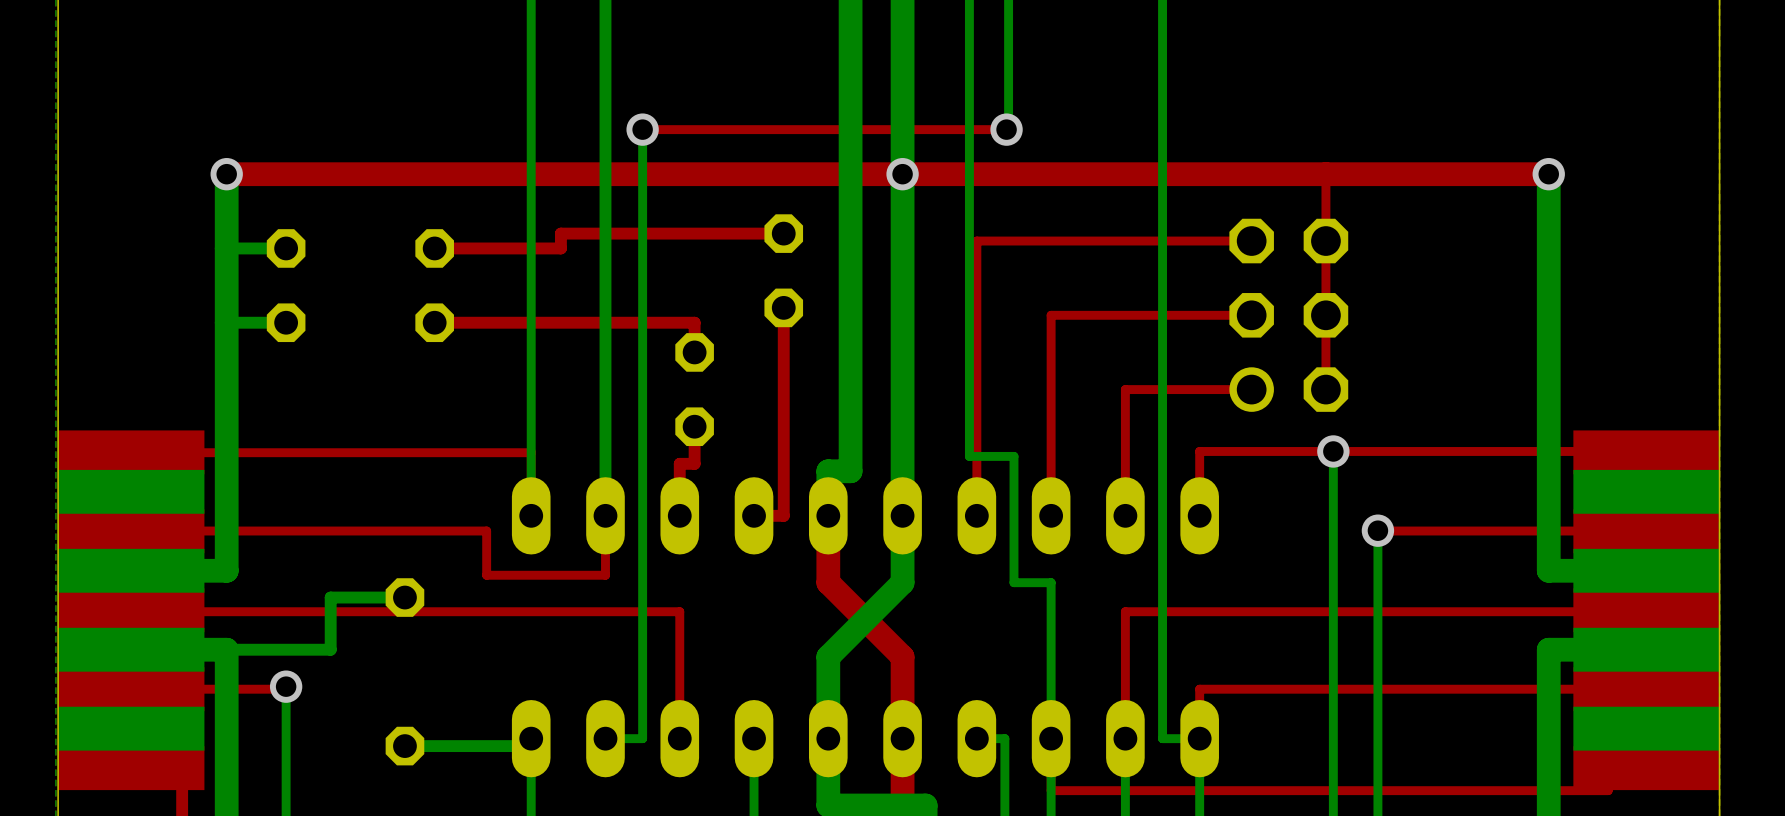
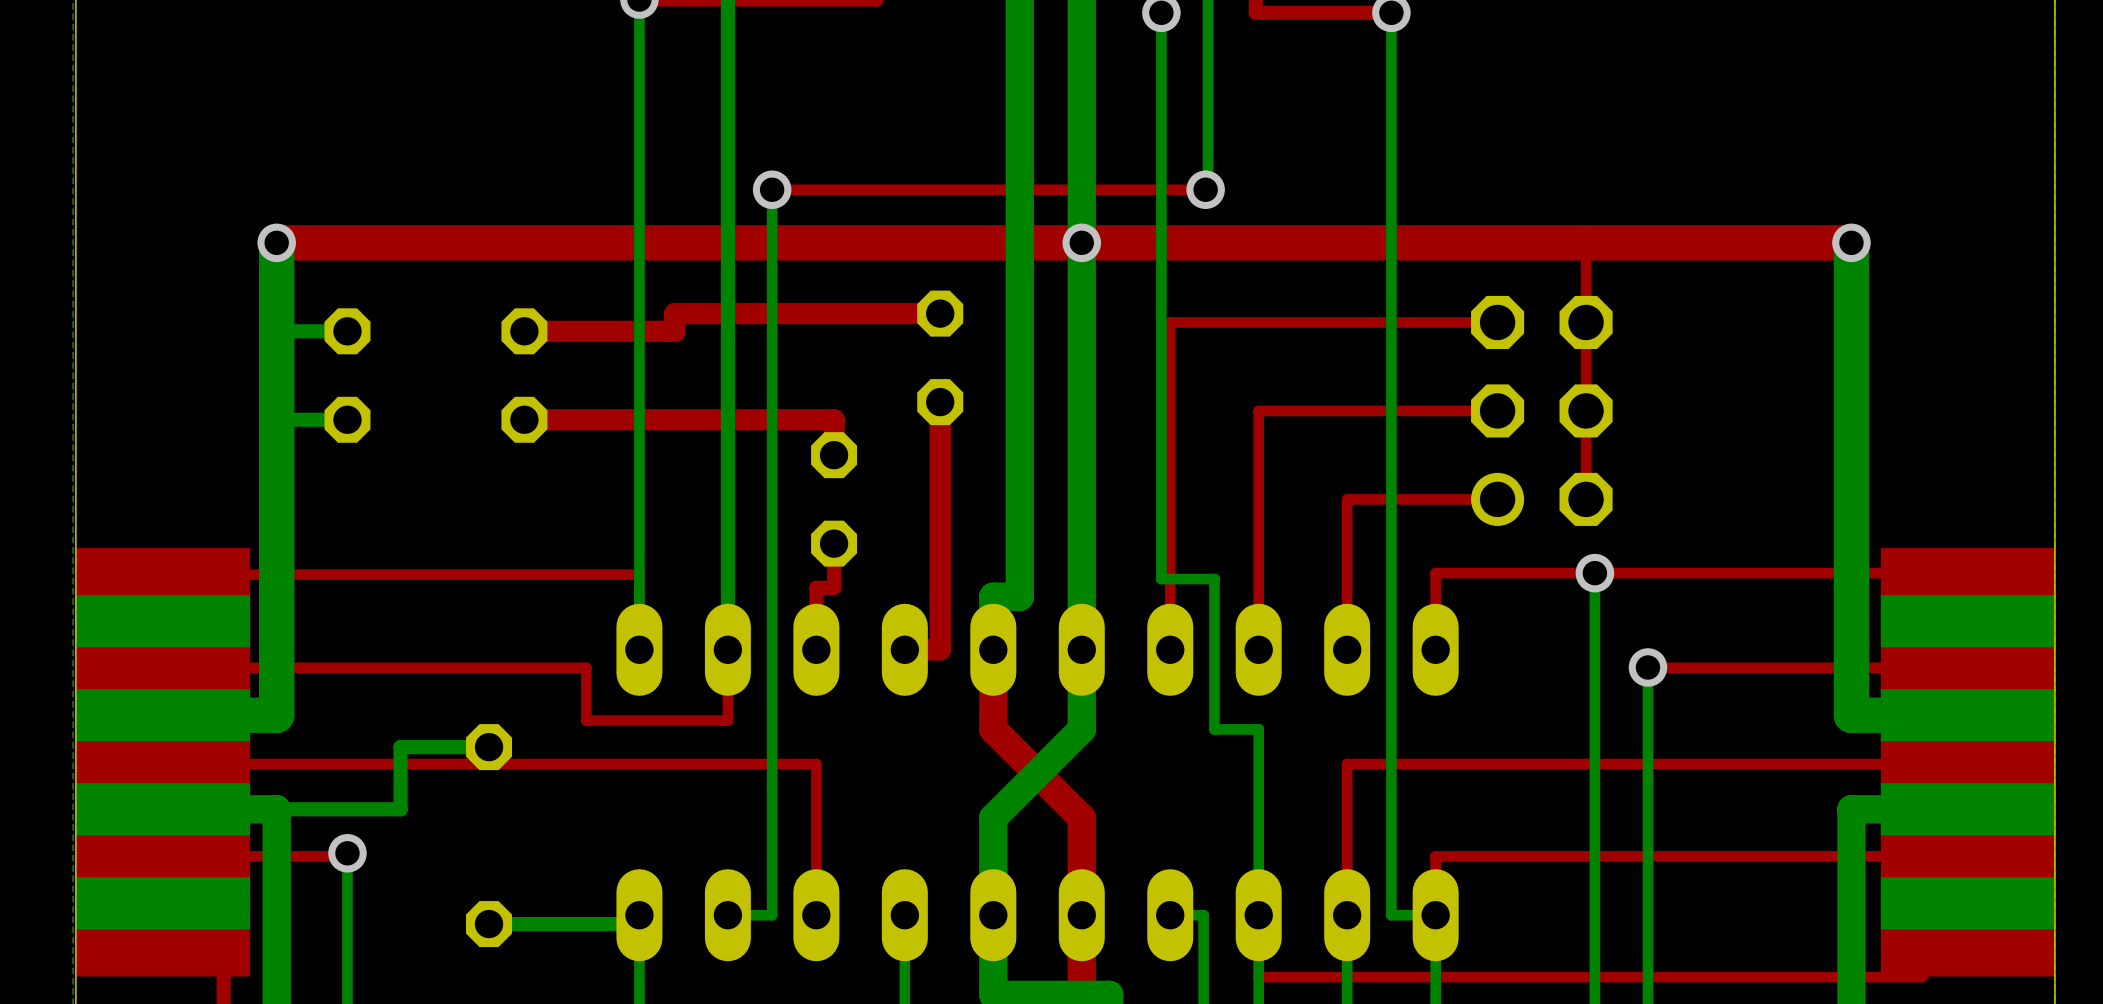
bottom track width: thin (226, 174) (226, 570) (107, 570) -> thick (276, 242) (276, 715) (134, 715)
top track width: thin (1548, 174) (226, 174) -> thick (1851, 242) (276, 242)
bottom track width: thin (1548, 174) (1548, 570) (1622, 570) -> thick (1851, 242) (1851, 715) (1939, 715)
top track width: thin (783, 233) (560, 233) (560, 248) (434, 248) -> thick (940, 313) (674, 313) (674, 331) (524, 331)
top track width: thin (783, 307) (783, 515) (754, 515) -> thick (940, 402) (940, 649) (904, 649)
top track width: thin (434, 322) (694, 322) (694, 352) -> thick (524, 419) (834, 419) (834, 455)

